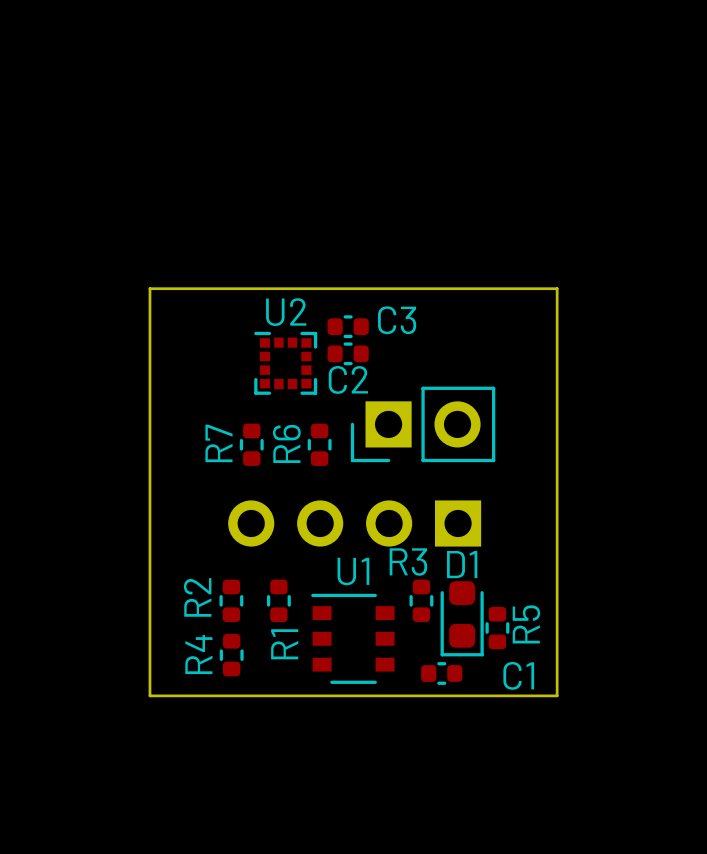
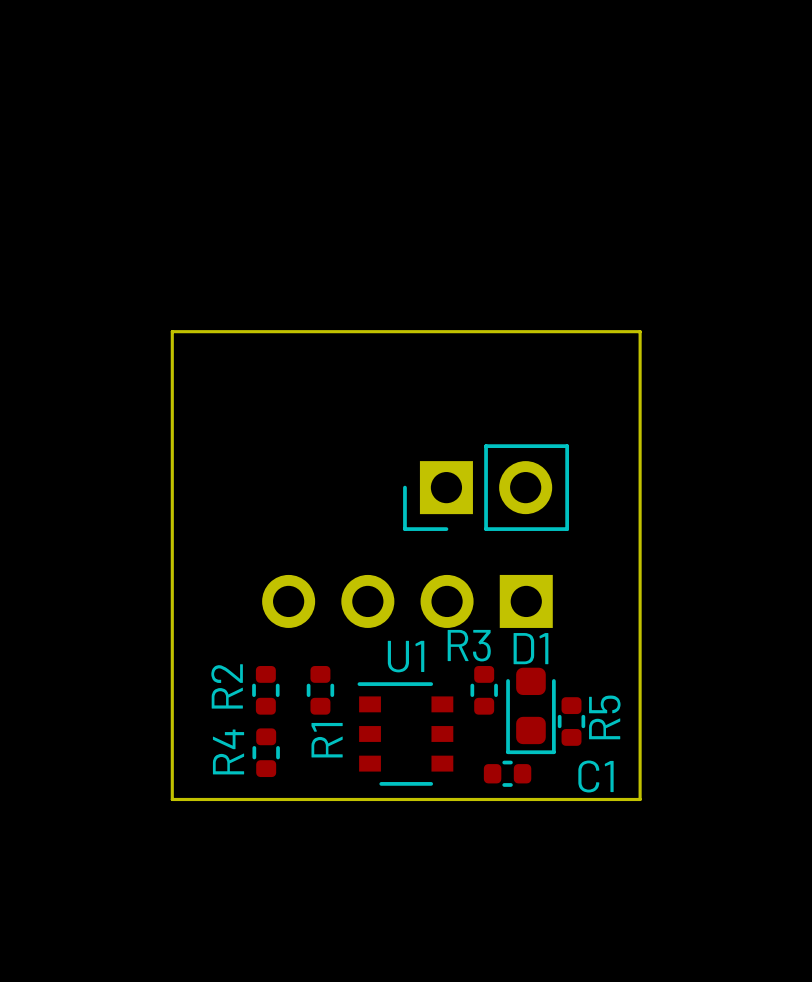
C3: (348, 326) -> none
C2: (348, 353) -> none
U2: (285, 363) -> none
R7: (251, 444) -> none
R6: (319, 444) -> none

